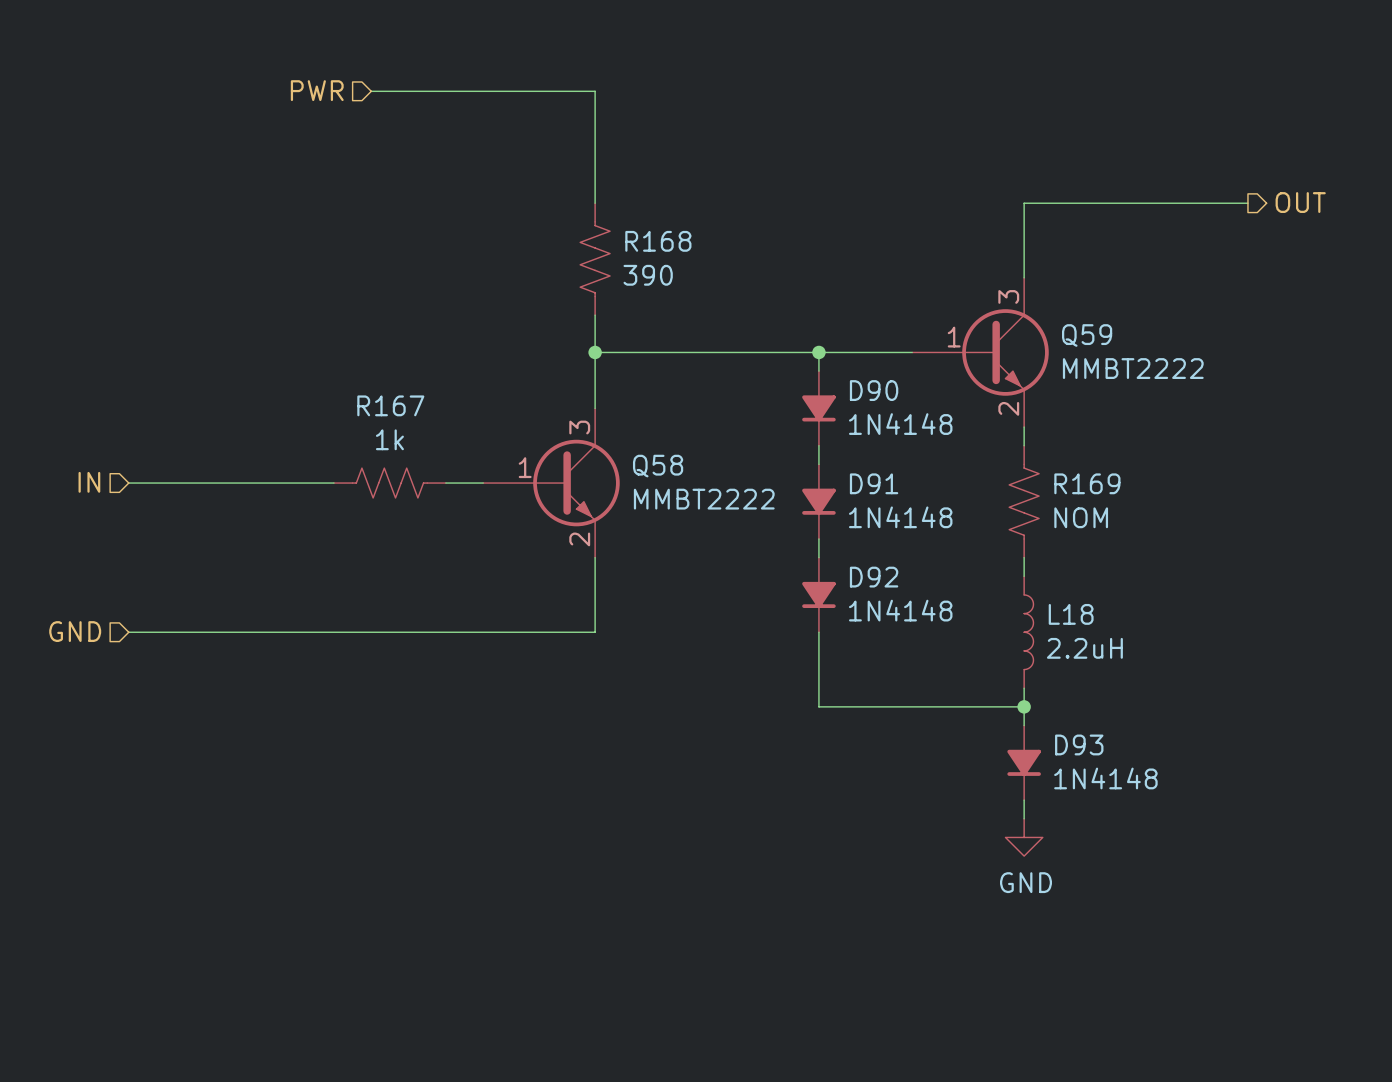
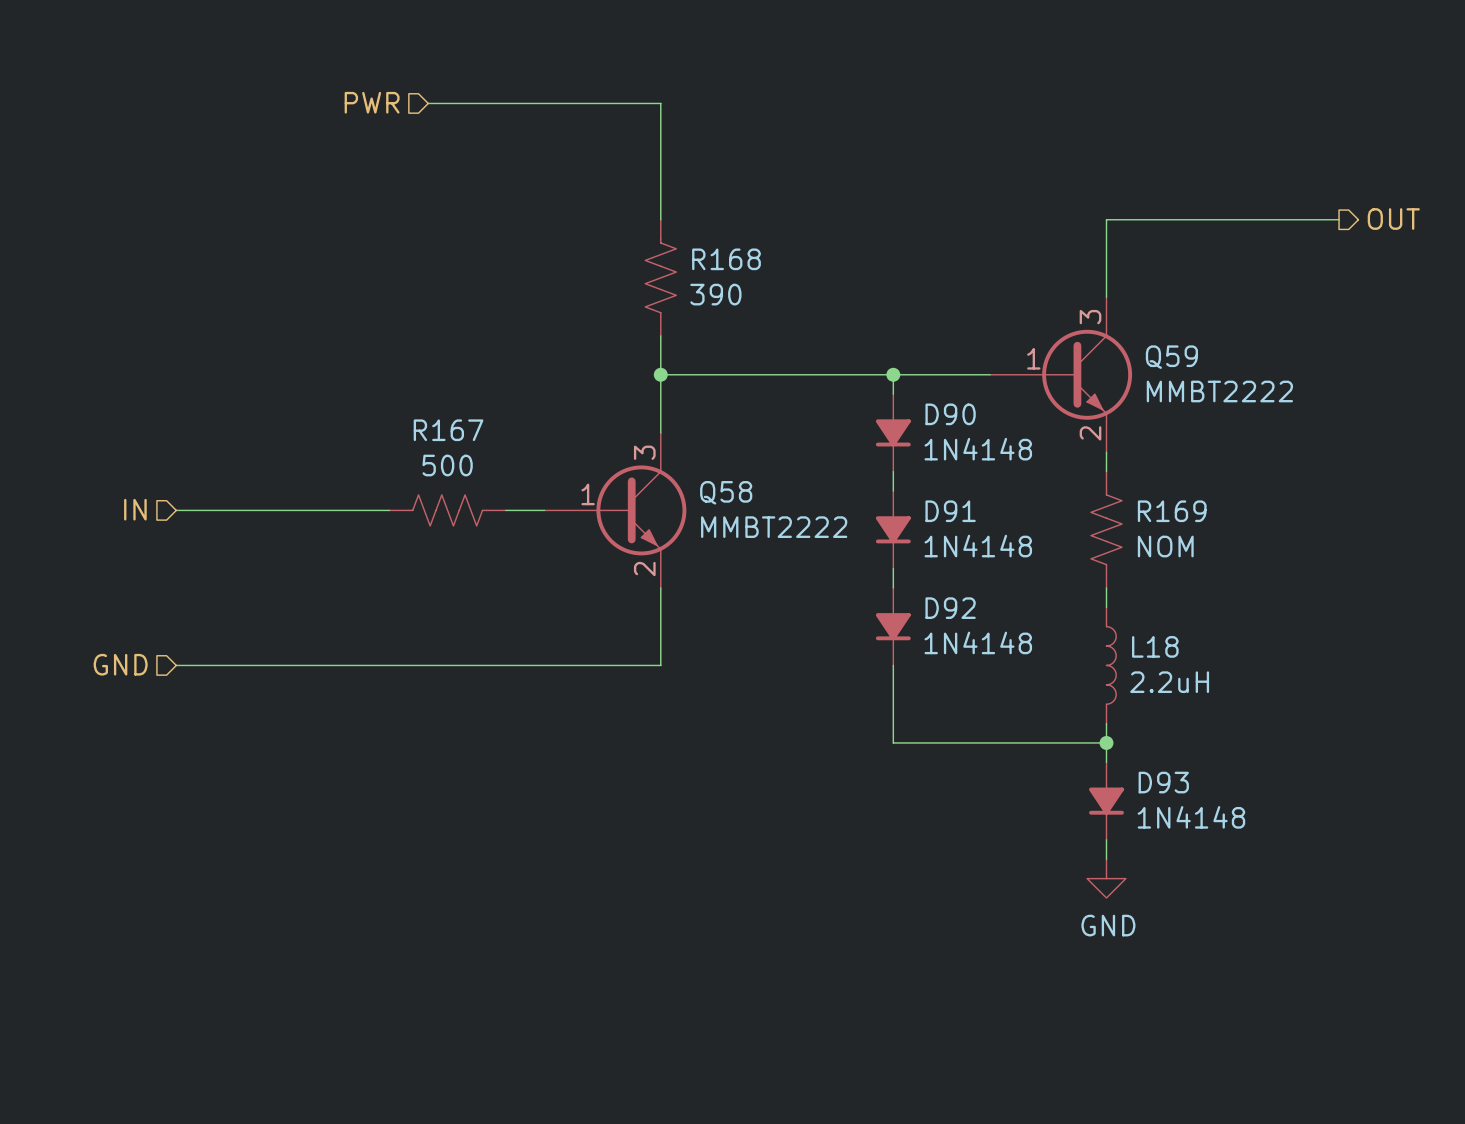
R167 value: 1k (389, 439) -> 500 (447, 465)

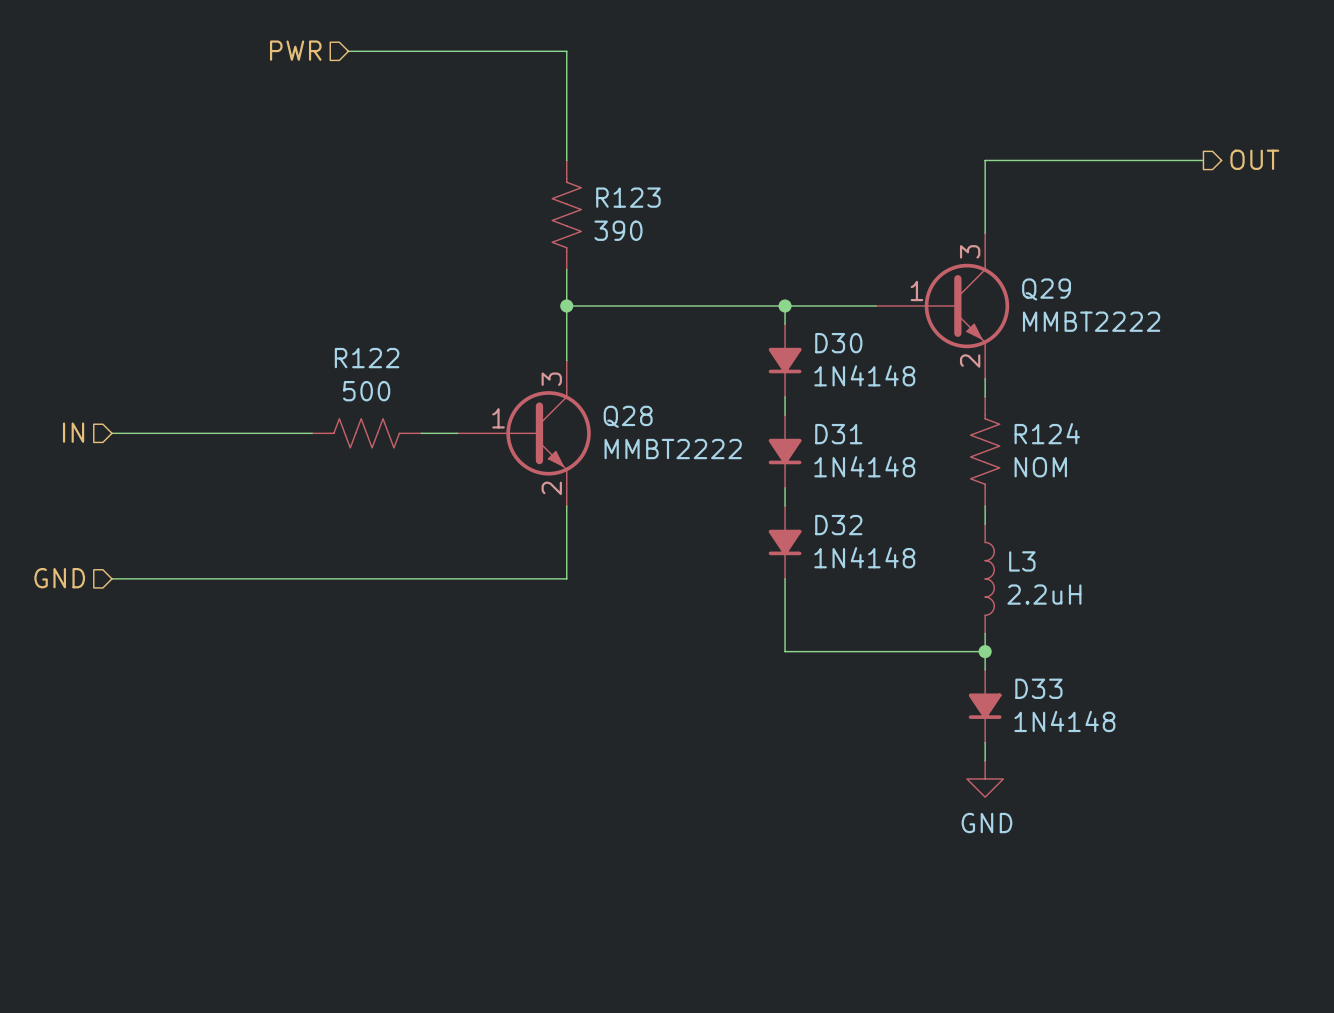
R168 name: R168 (726, 259) -> R123 (628, 197)
Q59 name: Q59 (1171, 357) -> Q29 (1046, 289)
D90 name: D90 (950, 414) -> D30 (838, 343)
R167 name: R167 (448, 430) -> R122 (367, 358)
Q58 name: Q58 (726, 492) -> Q28 (628, 416)
D91 name: D91 (950, 511) -> D31 (838, 434)
R169 name: R169 (1172, 511) -> R124 (1047, 433)
D92 name: D92 (950, 608) -> D32 (838, 525)
L18 name: L18 (1155, 646) -> L3 (1022, 561)
D93 name: D93 (1163, 782) -> D33 (1038, 688)

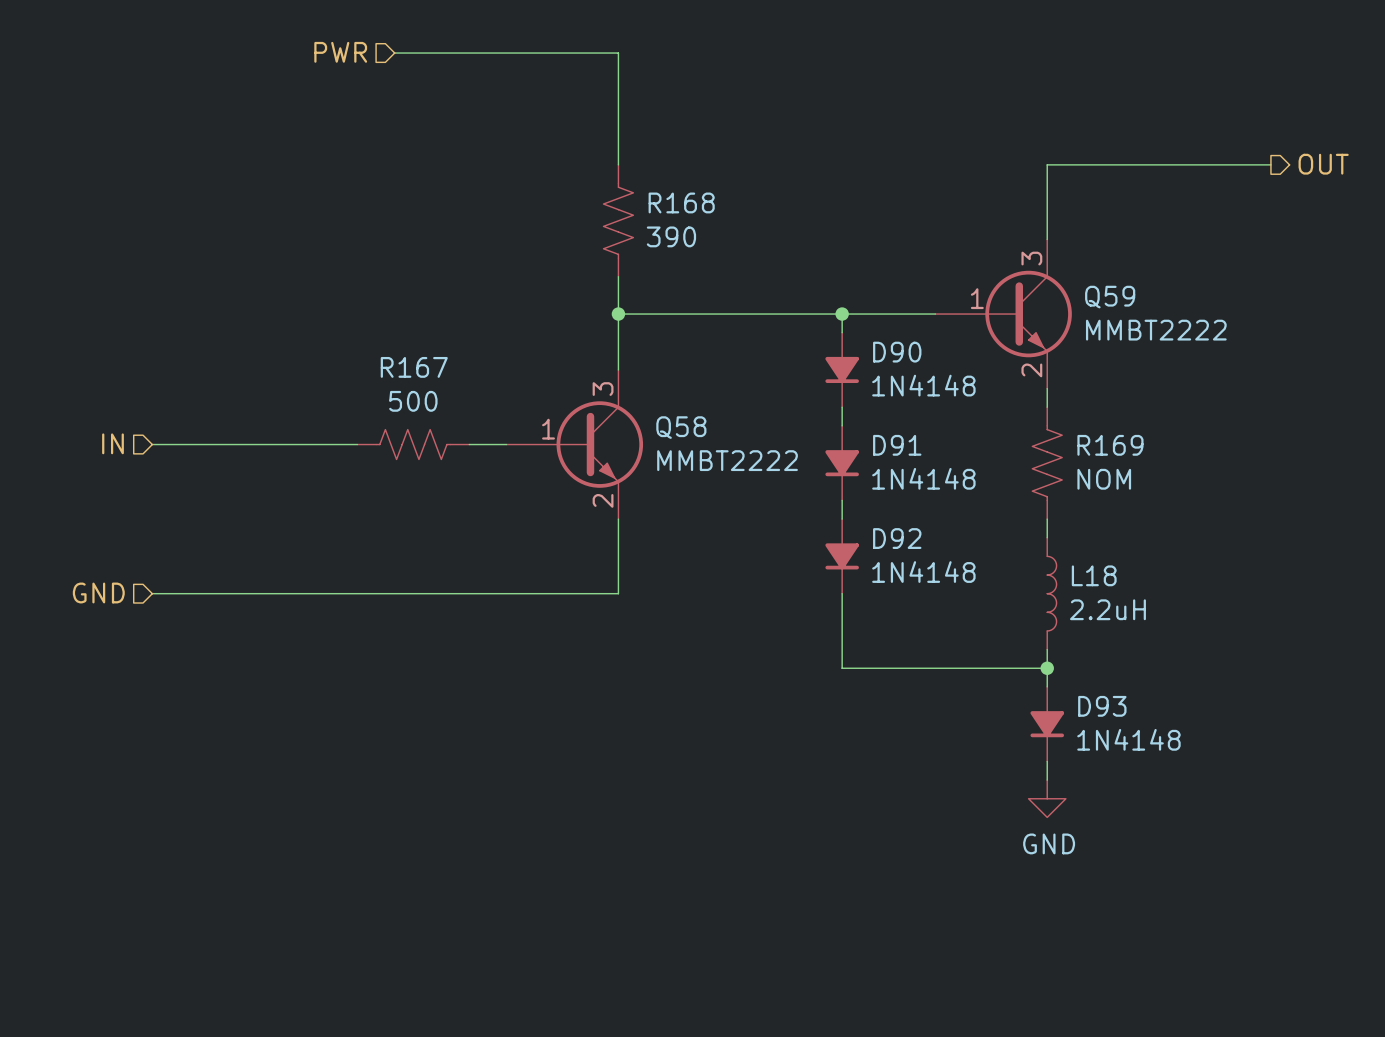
R123 name: R123 (628, 197) -> R168 (681, 202)
Q29 name: Q29 (1046, 289) -> Q59 (1110, 297)
D30 name: D30 (838, 343) -> D90 (897, 352)
R122 name: R122 (367, 358) -> R167 (414, 367)
Q28 name: Q28 (628, 416) -> Q58 (681, 427)
R124 name: R124 (1047, 433) -> R169 (1110, 445)
D31 name: D31 (838, 434) -> D91 (897, 445)
D32 name: D32 (838, 525) -> D92 (897, 538)
L3 name: L3 (1022, 561) -> L18 (1094, 575)
D33 name: D33 (1038, 688) -> D93 (1102, 706)

